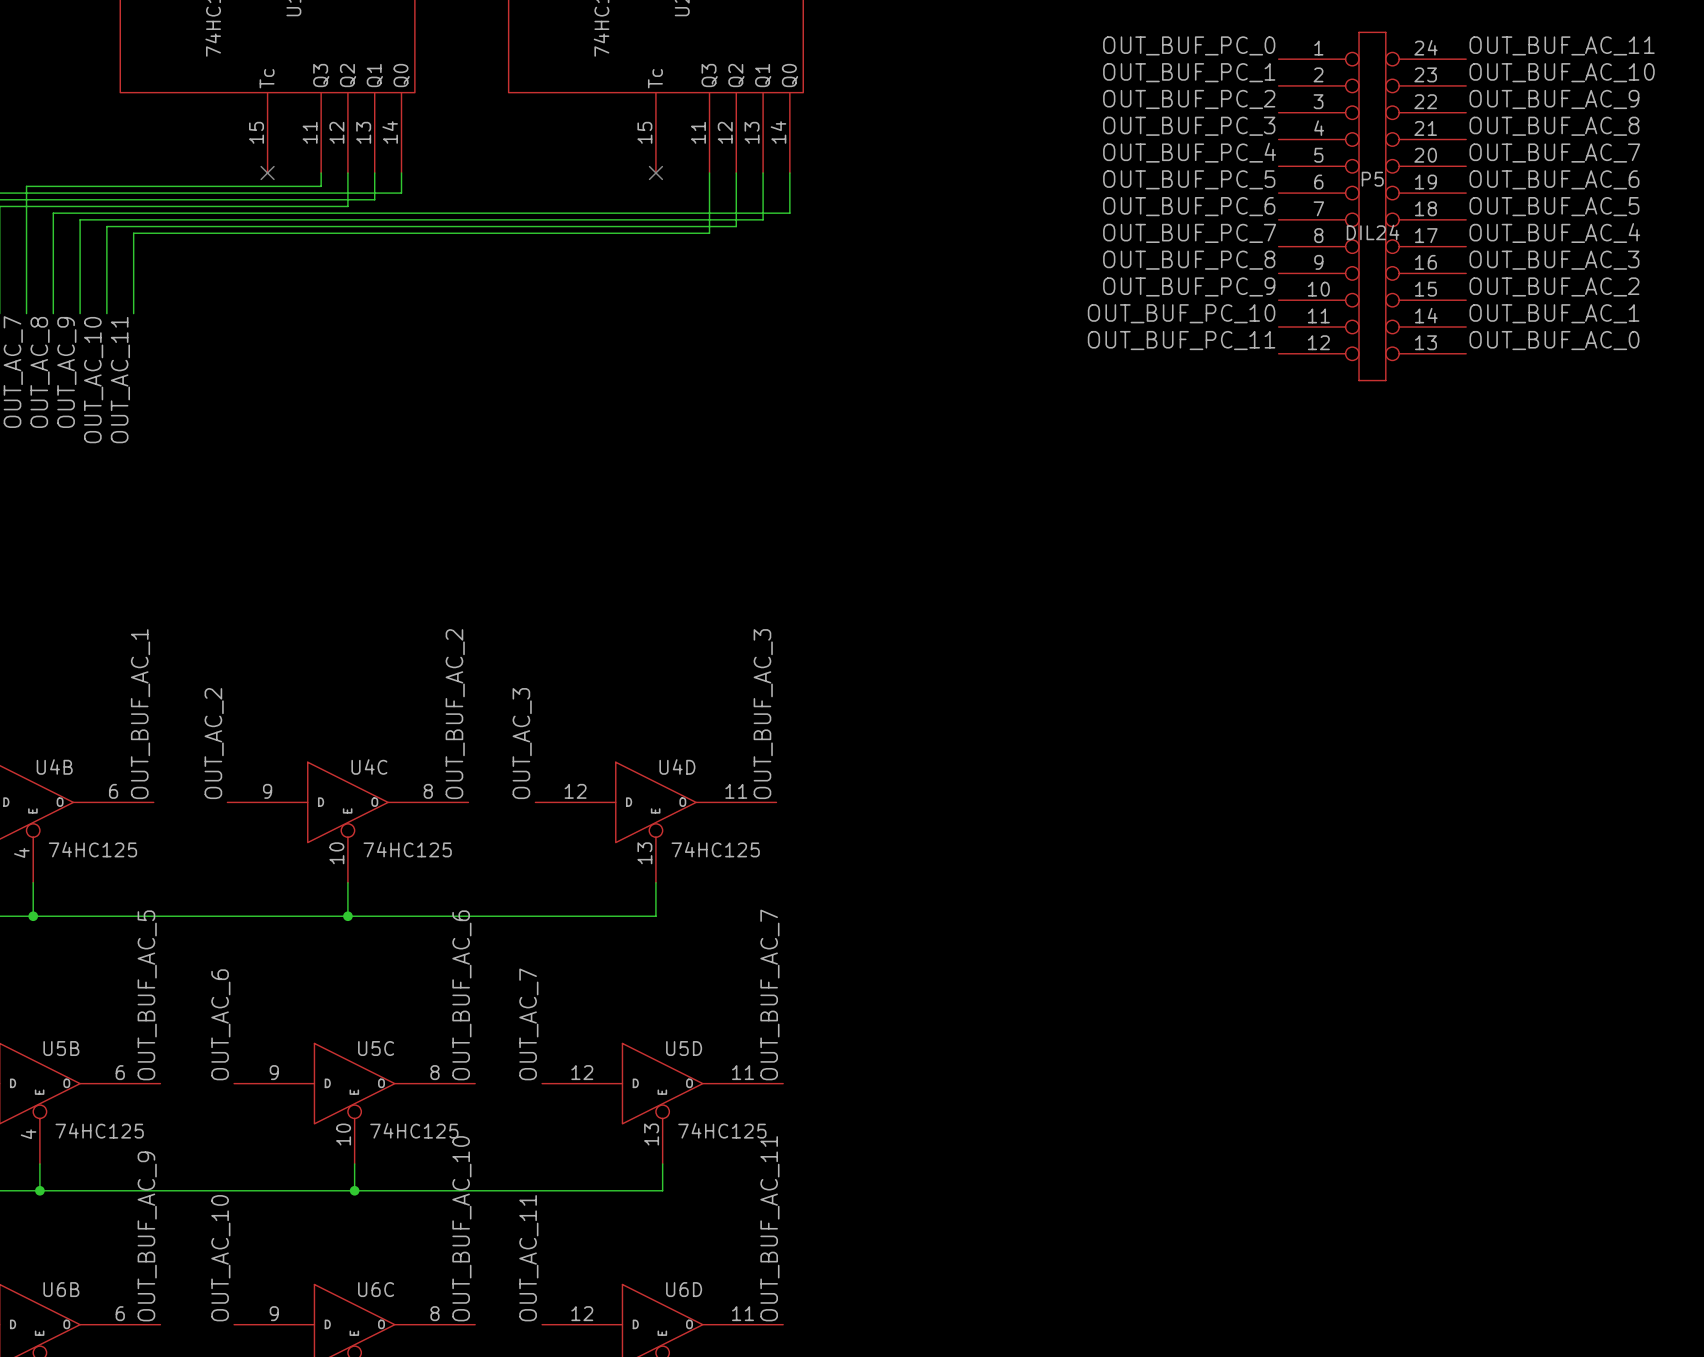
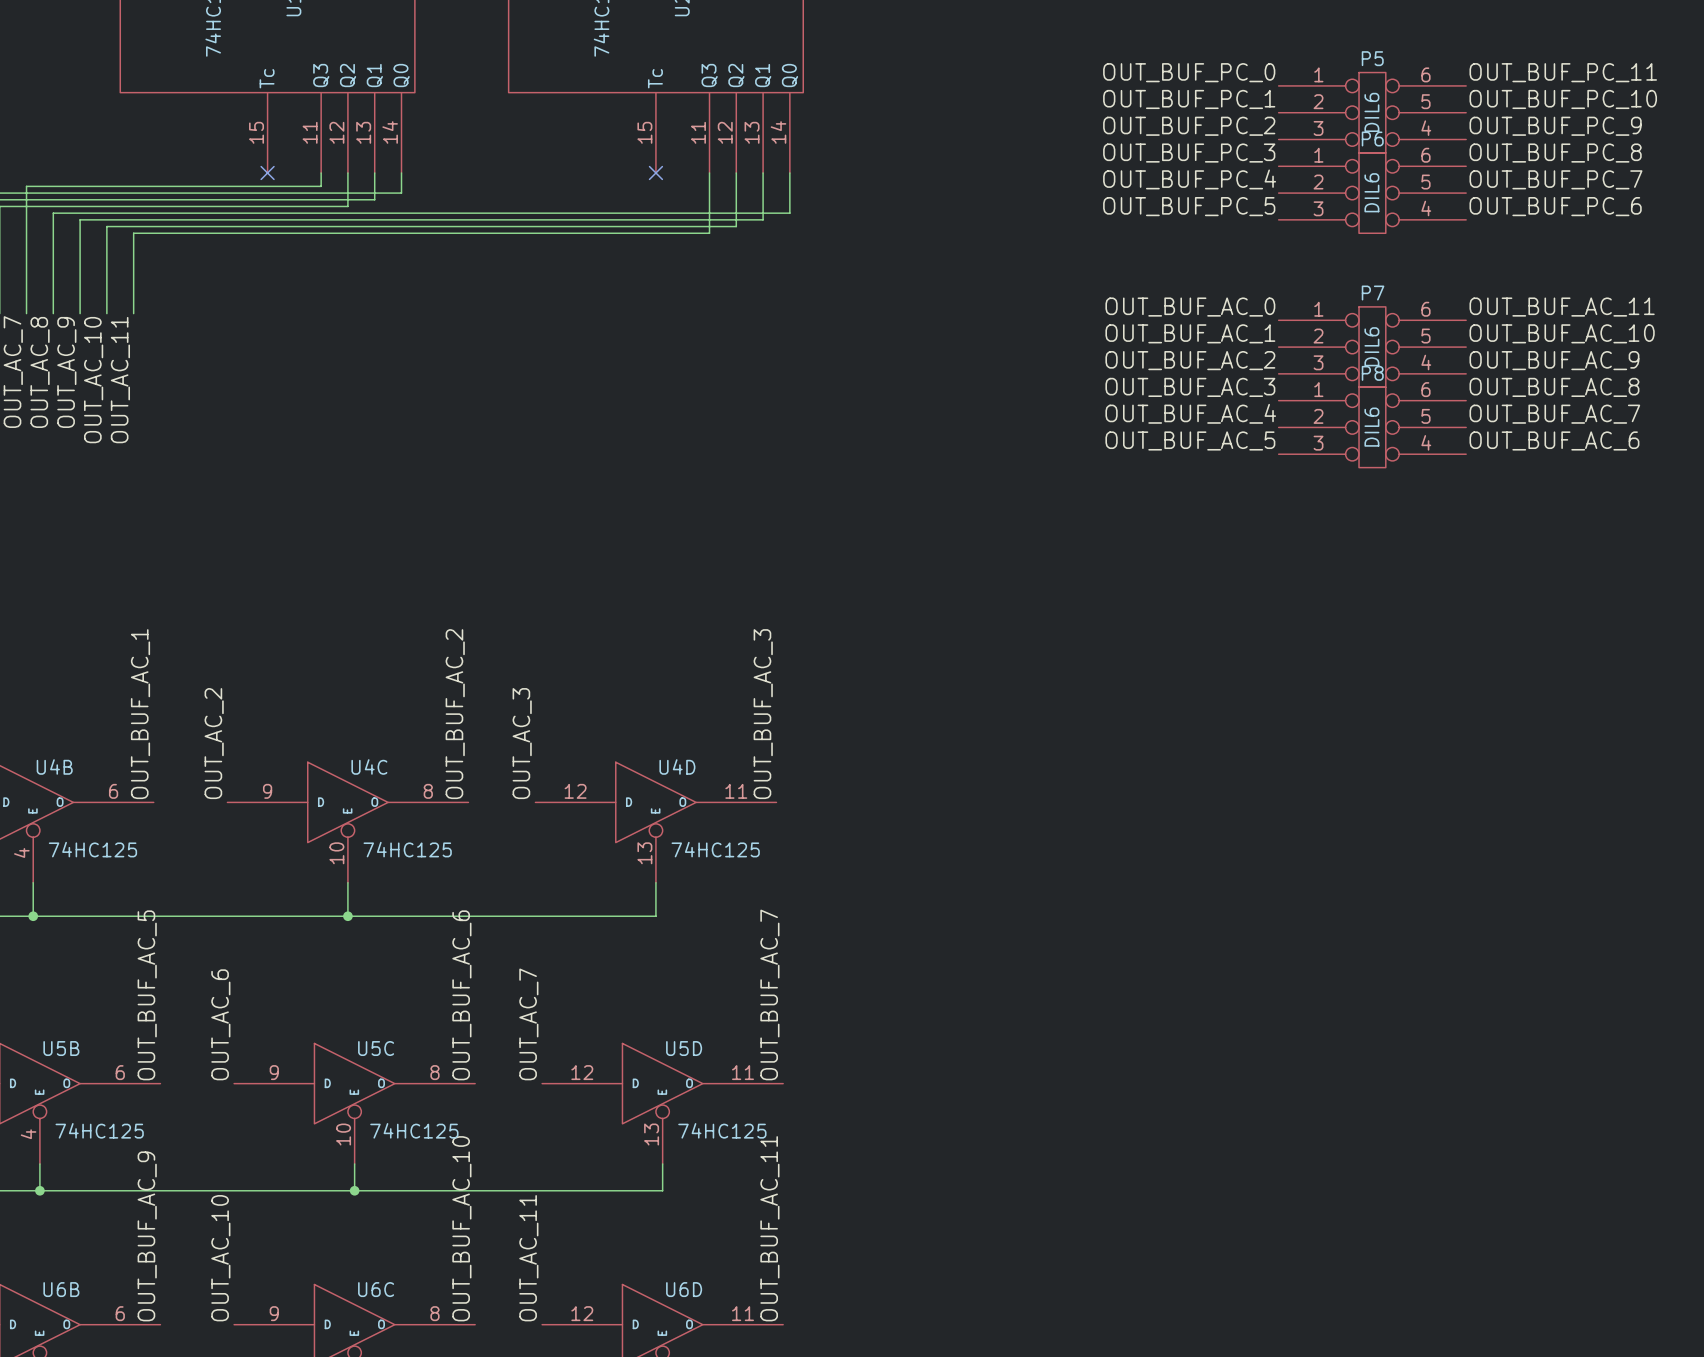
P5 symbol: [1278, 32, 1467, 381] -> [1278, 72, 1467, 153]
label: OUT_BUF_PC_0 (1189, 45) -> none
label position: OUT_BUF_AC_11 (1562, 45) -> OUT_BUF_AC_11 (1562, 307)
label: OUT_BUF_PC_1 (1189, 72) -> OUT_BUF_PC_0 (1189, 72)
label: OUT_BUF_AC_10 (1562, 72) -> OUT_BUF_PC_11 (1563, 72)
label: OUT_BUF_PC_2 (1189, 99) -> OUT_BUF_PC_1 (1189, 99)
label: OUT_BUF_AC_9 (1554, 99) -> OUT_BUF_PC_10 (1563, 99)
label: OUT_BUF_PC_3 (1189, 126) -> OUT_BUF_PC_2 (1189, 126)
label: OUT_BUF_AC_8 (1554, 126) -> OUT_BUF_PC_9 (1555, 126)
label: OUT_BUF_PC_4 (1189, 152) -> OUT_BUF_PC_3 (1189, 153)
label: OUT_BUF_AC_7 (1554, 153) -> OUT_BUF_PC_8 (1555, 153)
label: OUT_BUF_PC_5 (1189, 179) -> OUT_BUF_PC_4 (1189, 179)
P5 name position: P5 (1372, 179) -> P5 (1372, 58)
label: OUT_BUF_AC_6 (1554, 179) -> OUT_BUF_PC_7 (1555, 179)
P6: none -> DIL6 (1372, 193)
label: OUT_BUF_PC_6 (1189, 206) -> OUT_BUF_PC_5 (1189, 206)
label: OUT_BUF_AC_5 (1554, 206) -> OUT_BUF_PC_6 (1555, 206)
P5 value: DIL24 (1373, 232) -> DIL6 (1371, 112)
label: OUT_BUF_PC_7 (1189, 233) -> none
label position: OUT_BUF_AC_4 (1554, 233) -> OUT_BUF_AC_4 (1190, 413)
label: OUT_BUF_PC_8 (1189, 260) -> none
label position: OUT_BUF_AC_3 (1554, 260) -> OUT_BUF_AC_3 (1190, 387)
label: OUT_BUF_PC_9 (1189, 286) -> none
label position: OUT_BUF_AC_2 (1554, 286) -> OUT_BUF_AC_2 (1190, 360)
label: OUT_BUF_PC_10 (1181, 313) -> none
label position: OUT_BUF_AC_1 (1554, 313) -> OUT_BUF_AC_1 (1190, 333)
label: none -> OUT_BUF_AC_10 (1562, 333)
label: OUT_BUF_PC_11 (1181, 340) -> none
label position: OUT_BUF_AC_0 (1554, 340) -> OUT_BUF_AC_0 (1190, 307)
P7: none -> DIL6 (1372, 347)
label: none -> OUT_BUF_AC_9 (1554, 360)
label: none -> OUT_BUF_AC_8 (1554, 387)
label: none -> OUT_BUF_AC_7 (1554, 414)
P8: none -> DIL6 (1372, 427)
label: none -> OUT_BUF_AC_5 (1190, 440)
label: none -> OUT_BUF_AC_6 (1554, 440)

